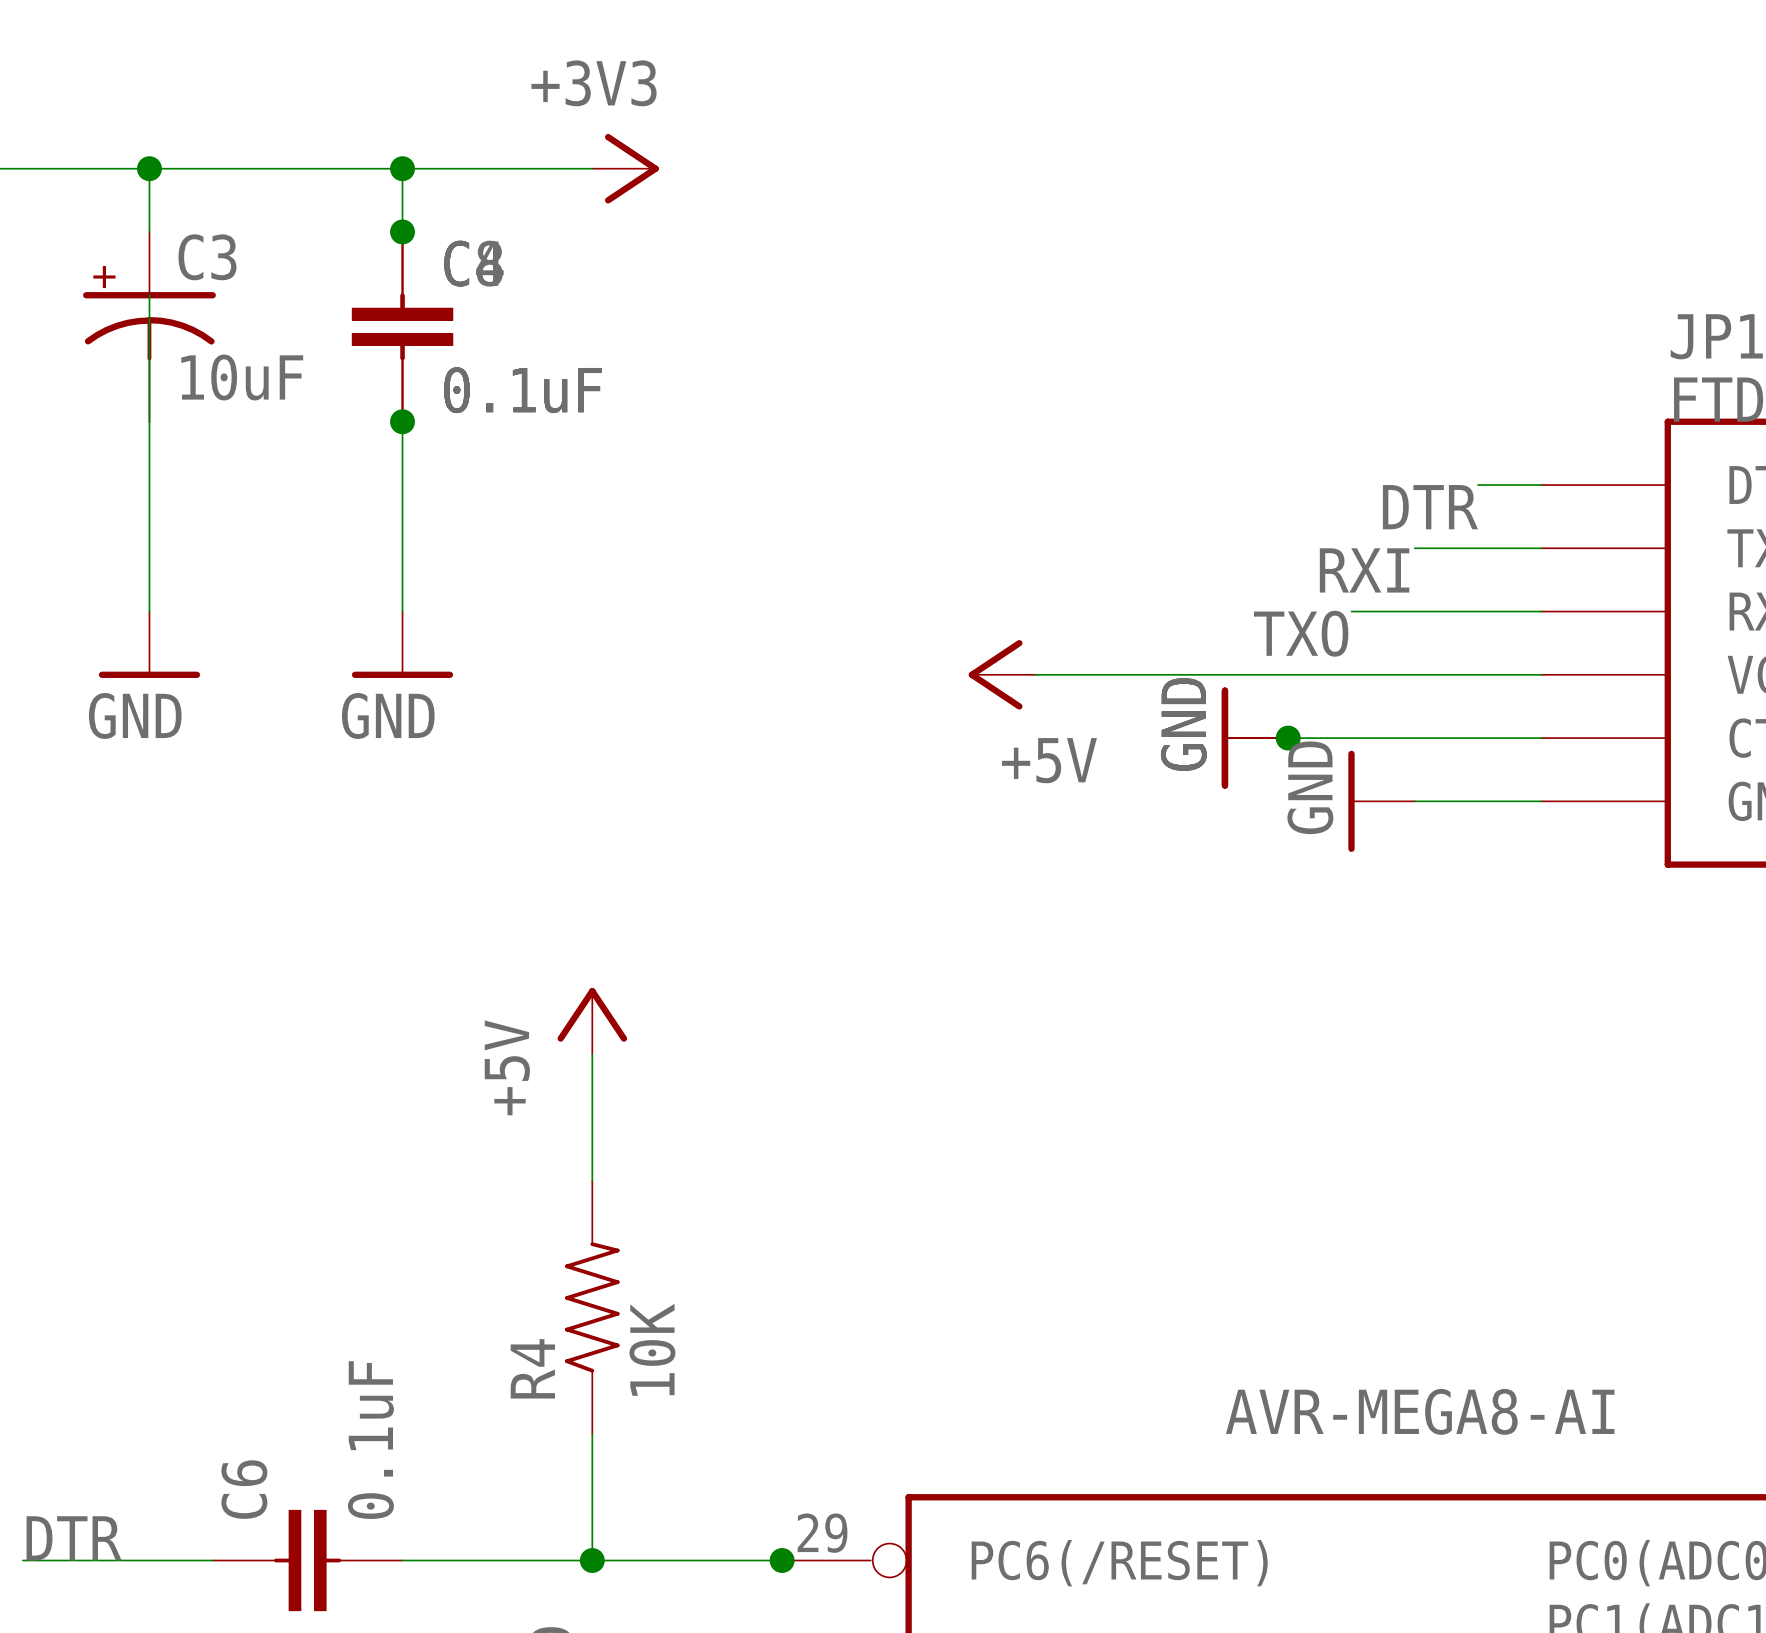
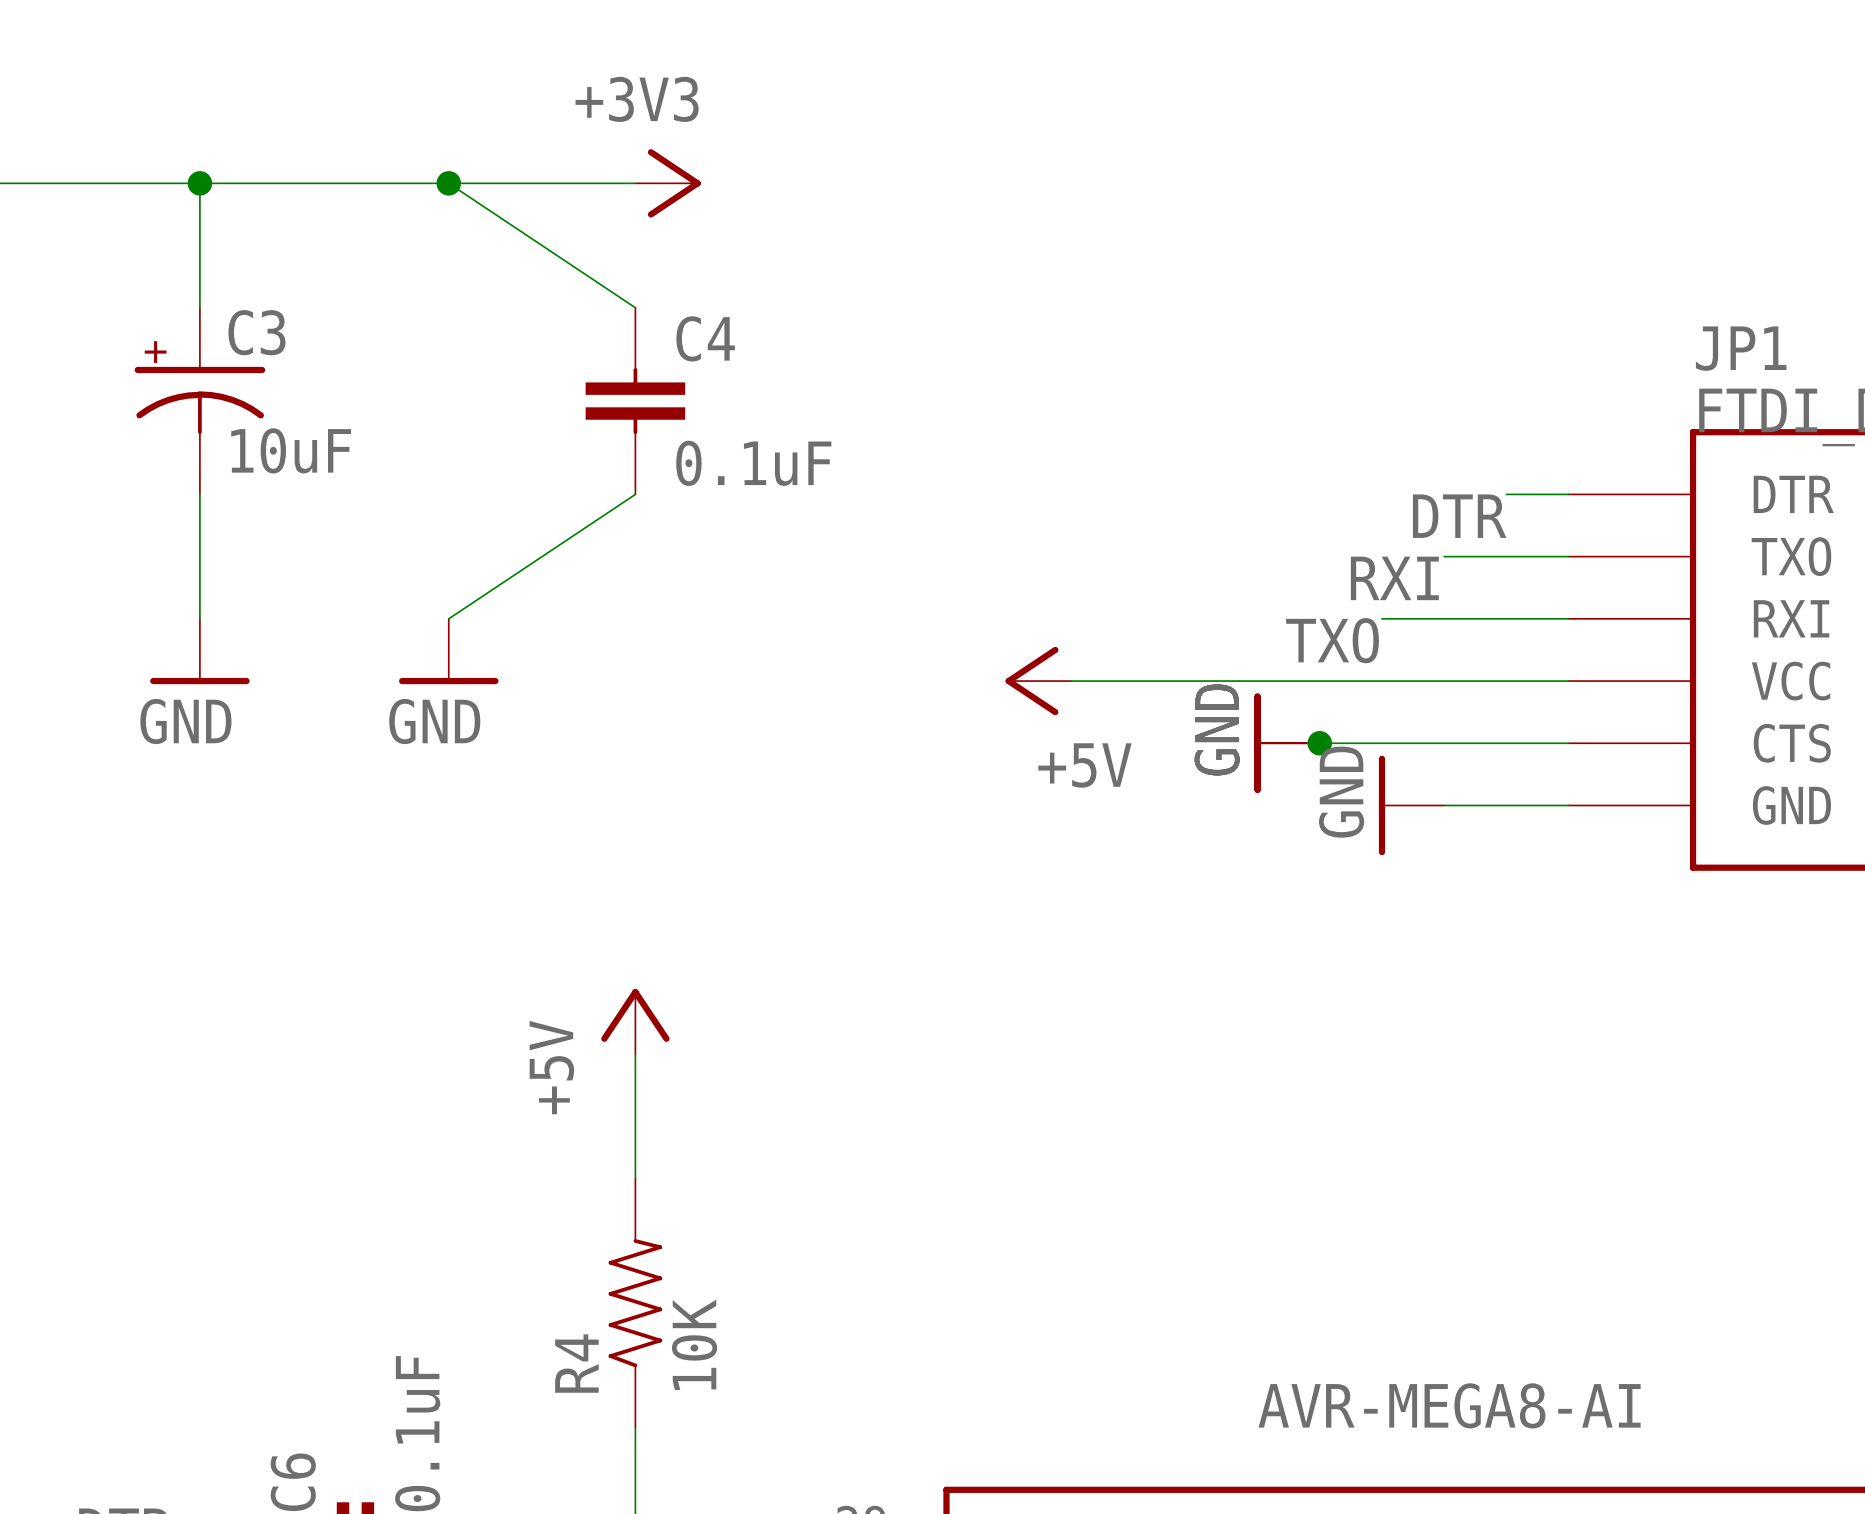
wire: (402, 168) (402, 231) -> (448, 183) (635, 307)
junction: (402, 231) -> none
C3 position: (149, 326) -> (199, 401)
C4 position: (402, 326) -> (635, 401)
part: 0.1uF (402, 326) -> none
wire: (402, 421) (402, 611) -> (635, 494) (448, 618)
junction: (402, 421) -> none

